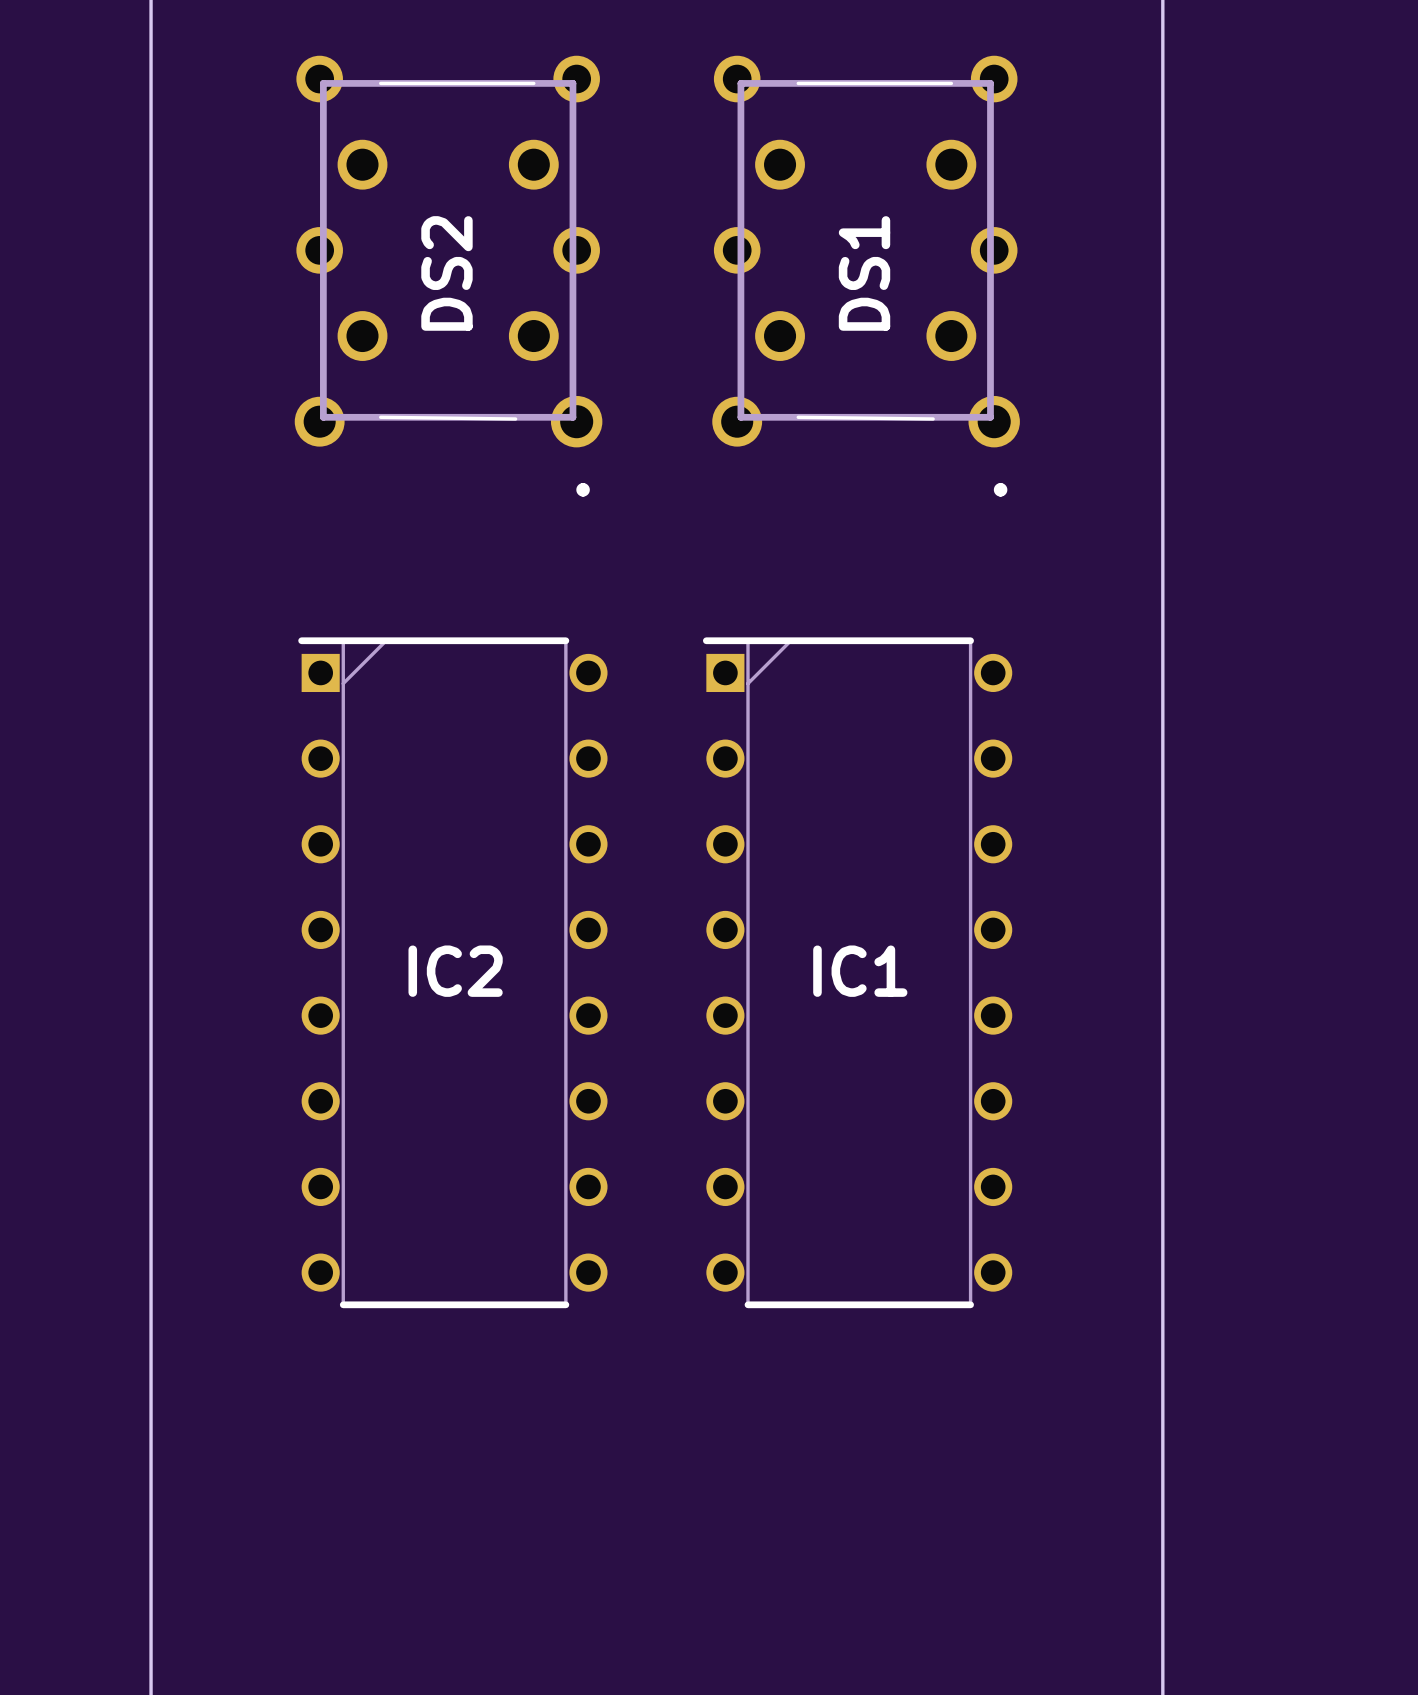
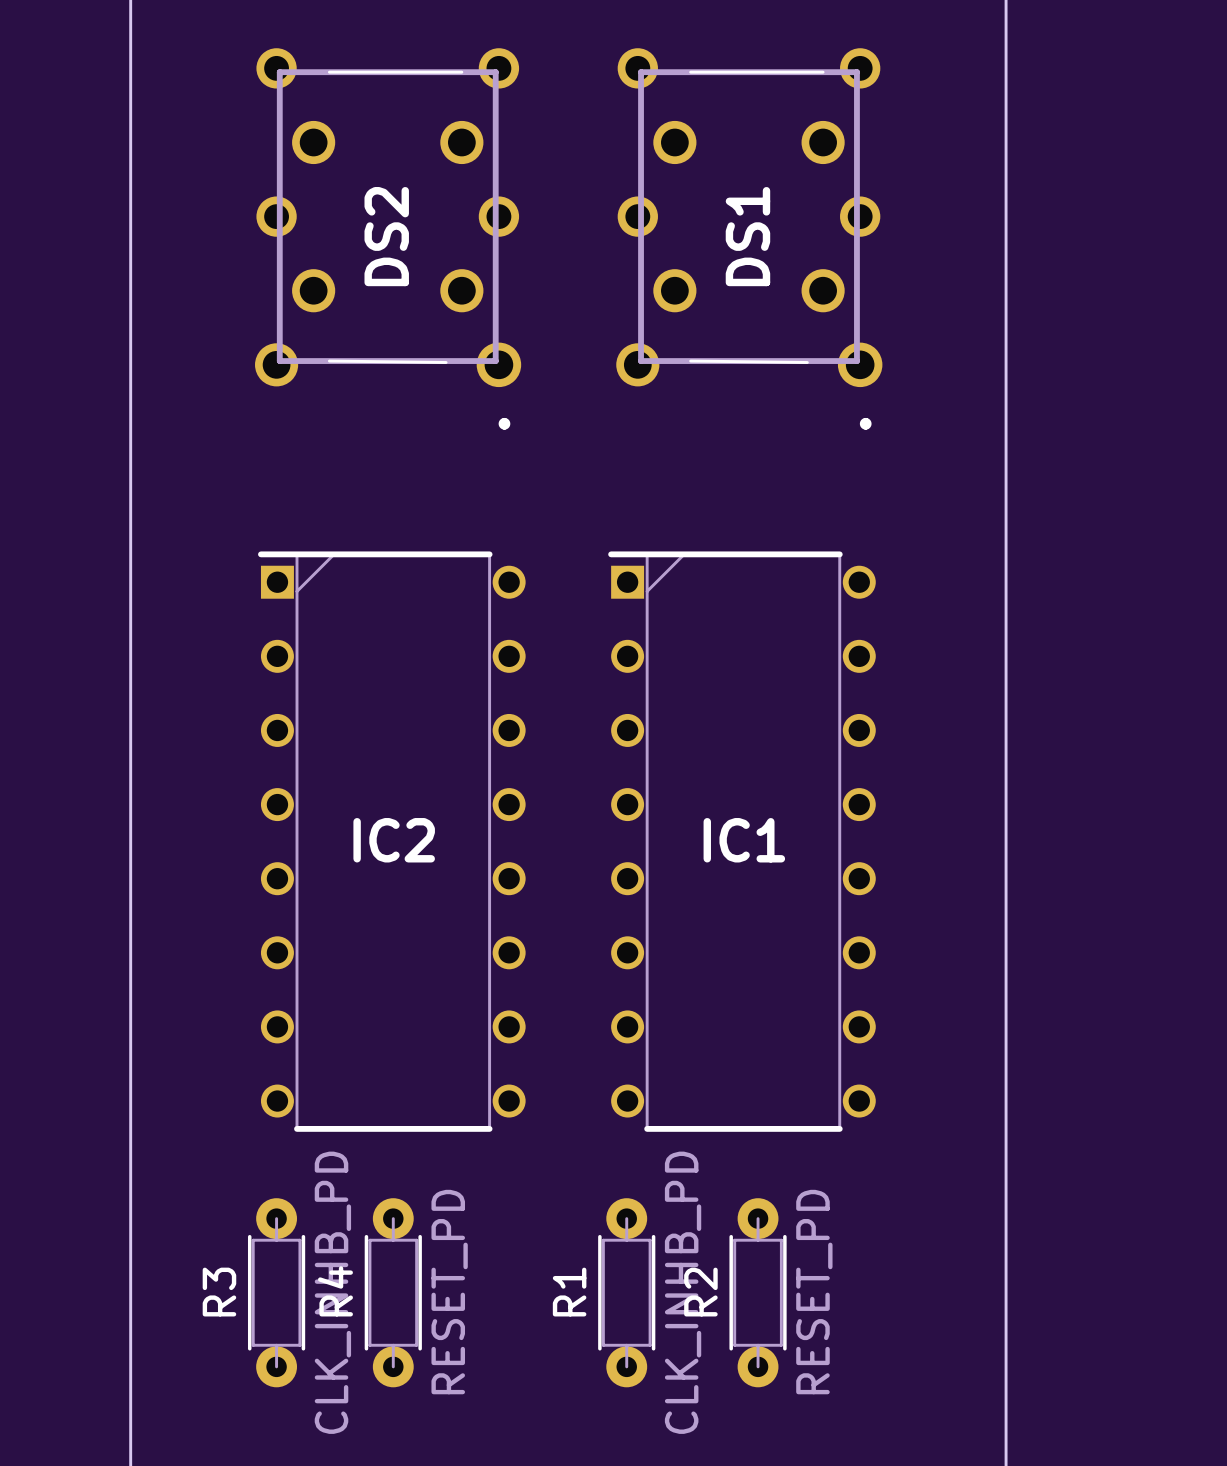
R3: none -> CLK_INHB_PD (276, 1292)
R4: none -> RESET_PD (393, 1292)
R1: none -> CLK_INHB_PD (626, 1292)
R2: none -> RESET_PD (758, 1292)

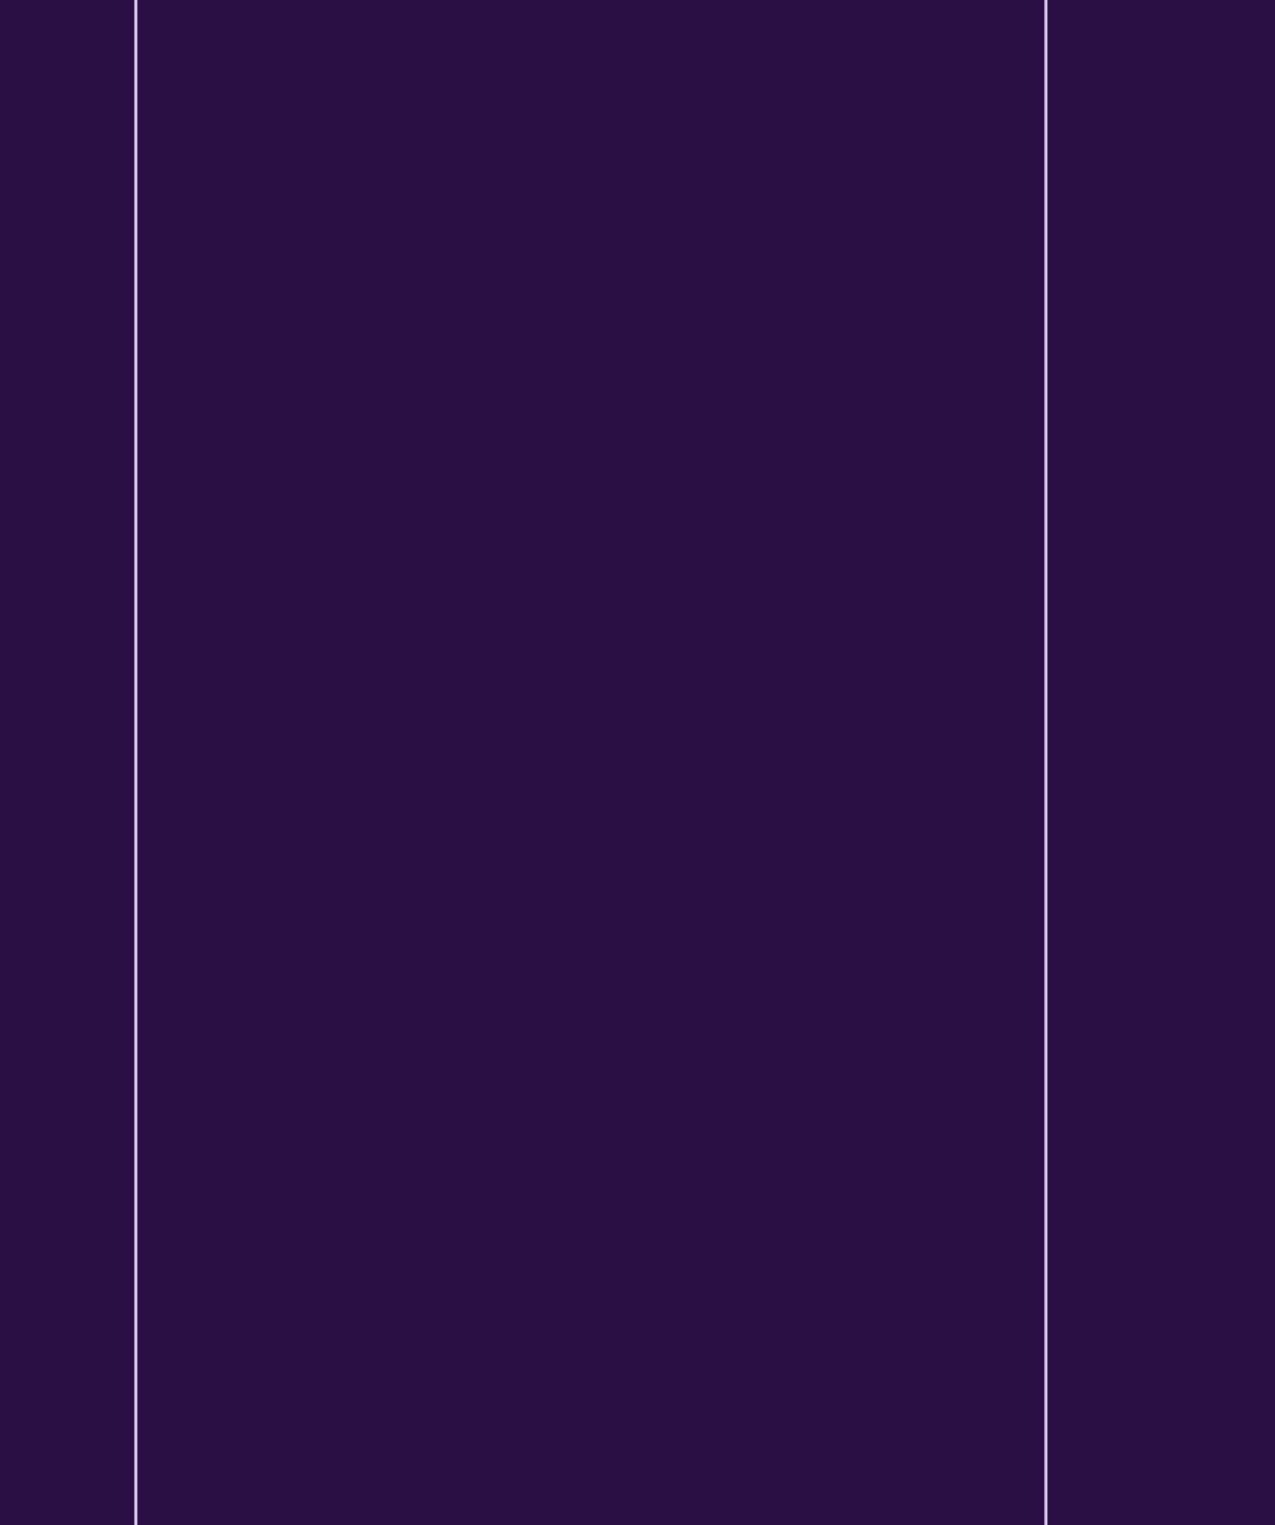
DS2: (388, 238) -> none
DS1: (749, 238) -> none
IC2: (391, 841) -> none
IC1: (741, 841) -> none
R3: CLK_INHB_PD (276, 1292) -> none
R4: RESET_PD (393, 1292) -> none
R1: CLK_INHB_PD (626, 1292) -> none
R2: RESET_PD (758, 1292) -> none

